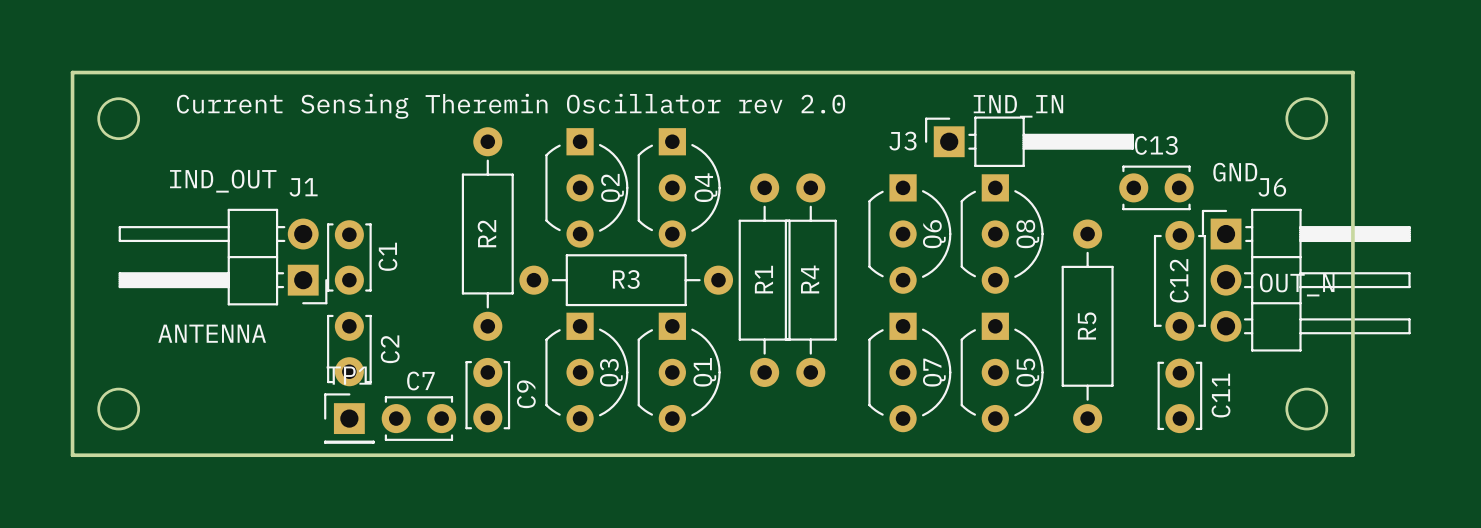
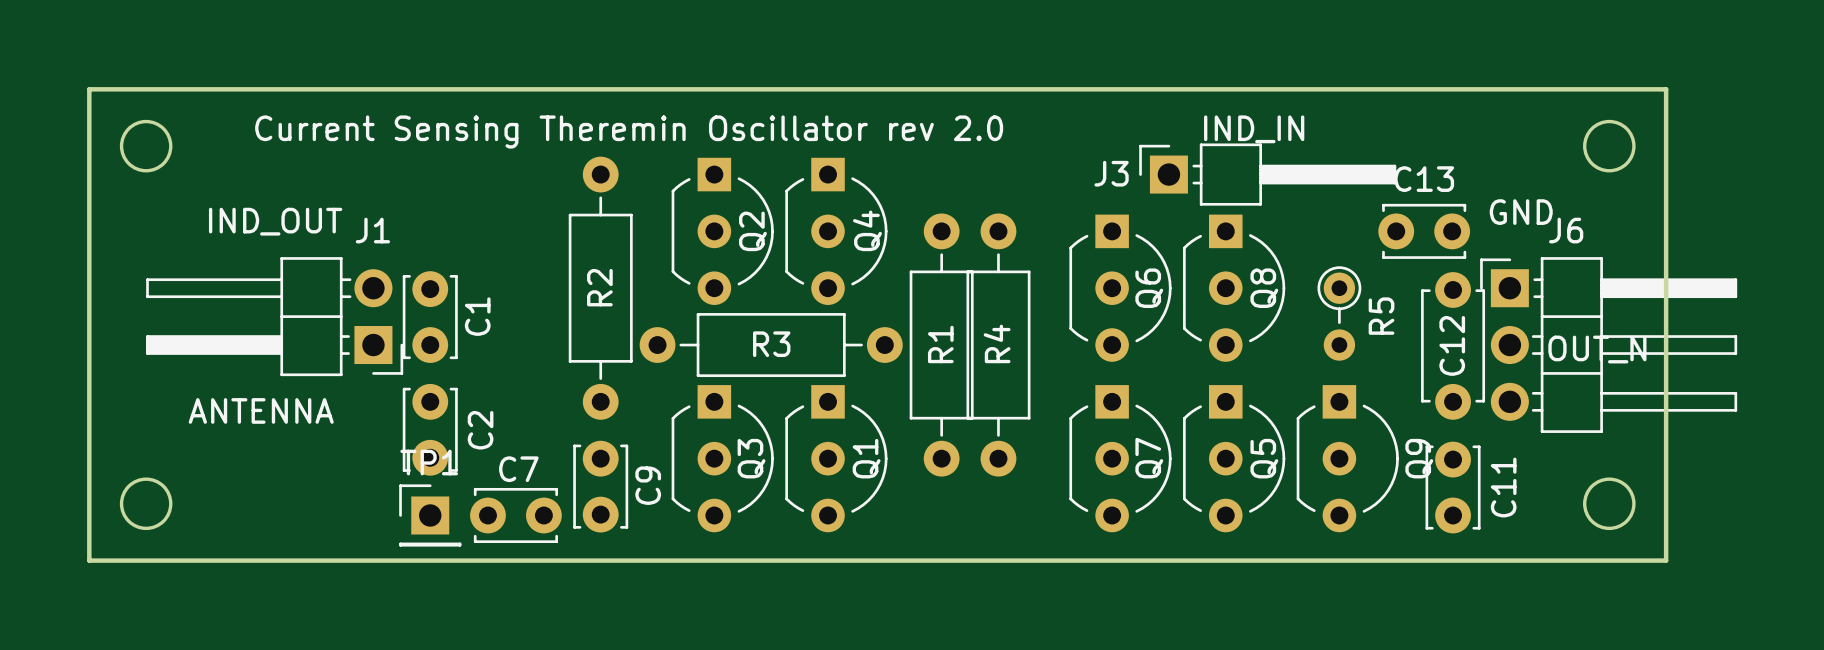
R5 footprint: [1061, 219, 1114, 434] -> [1317, 266, 1362, 361]
Q9: none -> (1347, 458)

